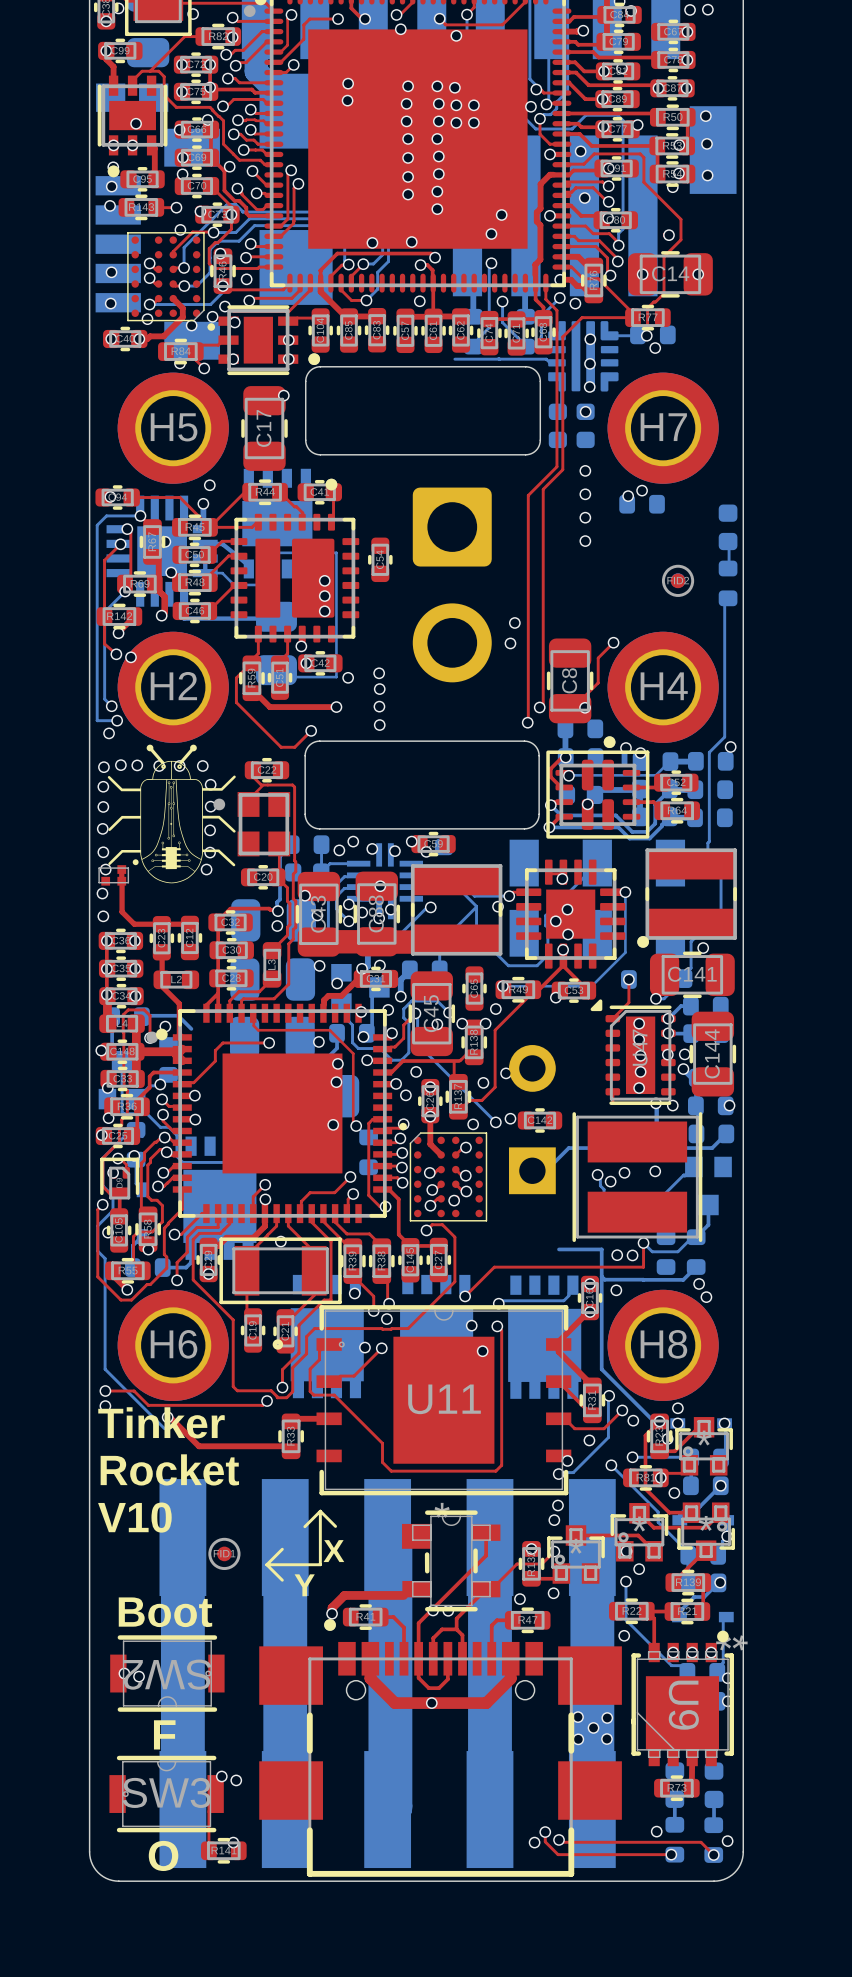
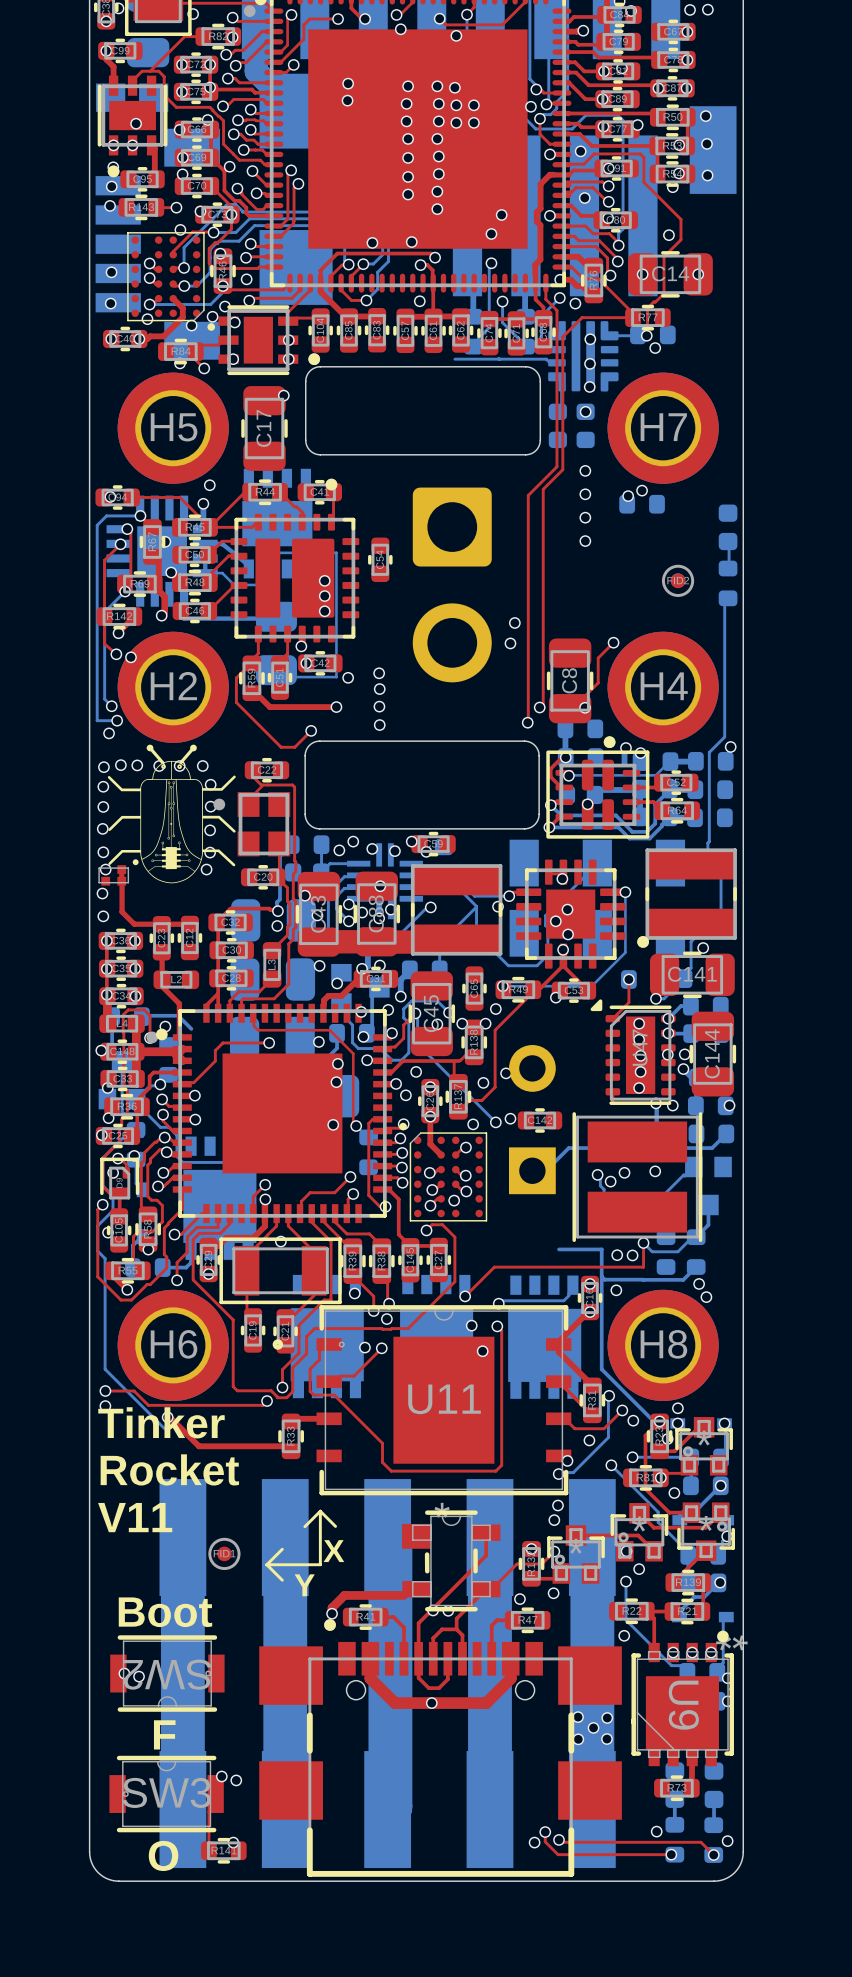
text: V10 (134, 1517) -> V11 (135, 1517)

